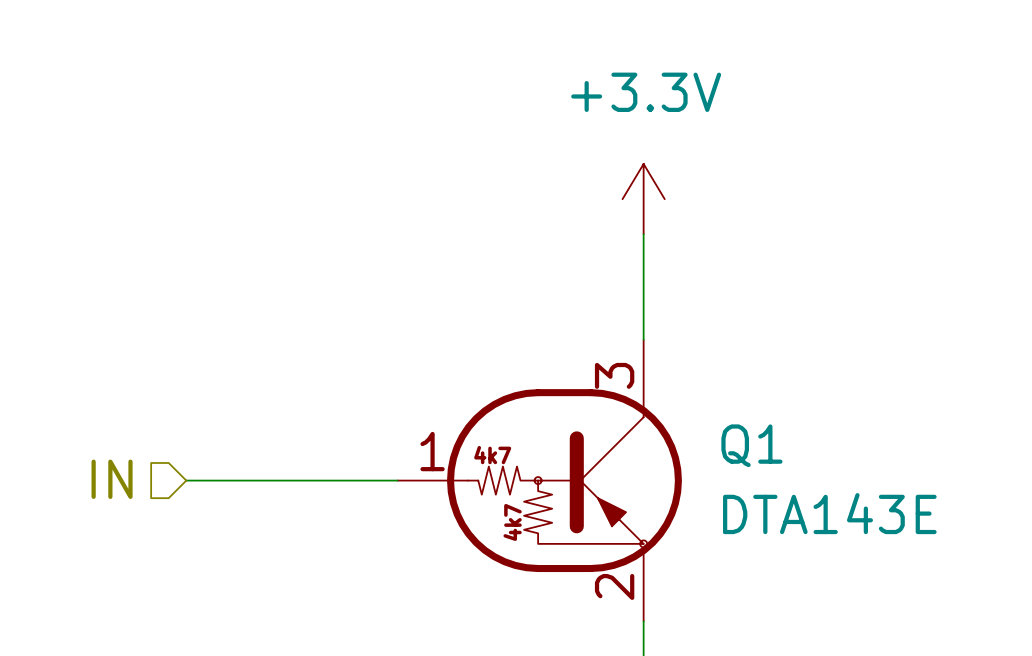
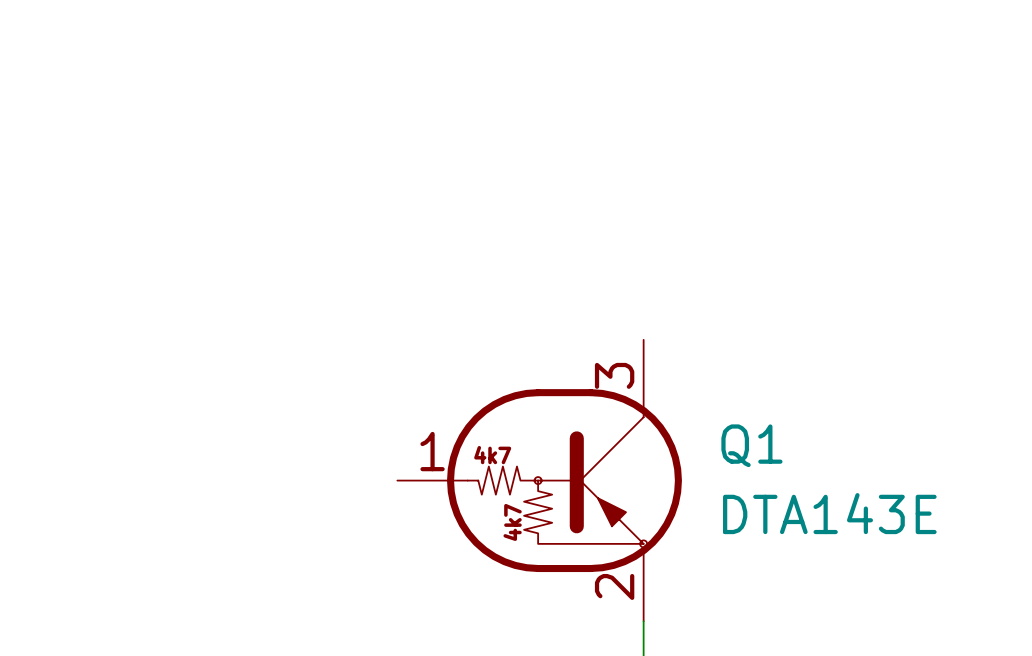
power symbol: +3.3V (643, 199) -> none
wire: (643, 234) (643, 339) -> none
hierarchical label: IN (112, 479) -> none
wire: (186, 480) (397, 480) -> none

